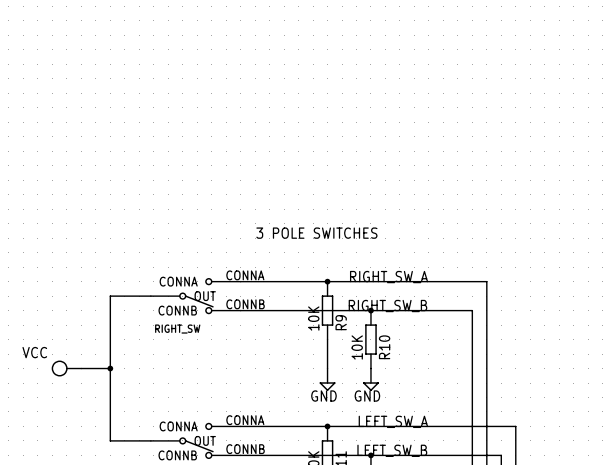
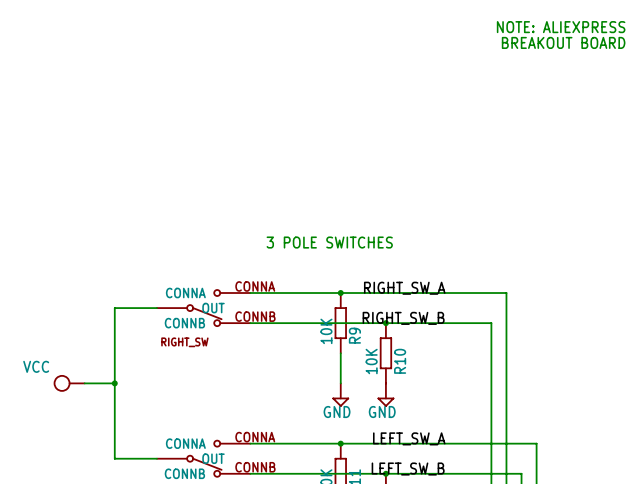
text: none -> NOTE: ALIEXPRESS (561, 27)
text: none -> BREAKOUT BOARD (563, 42)

